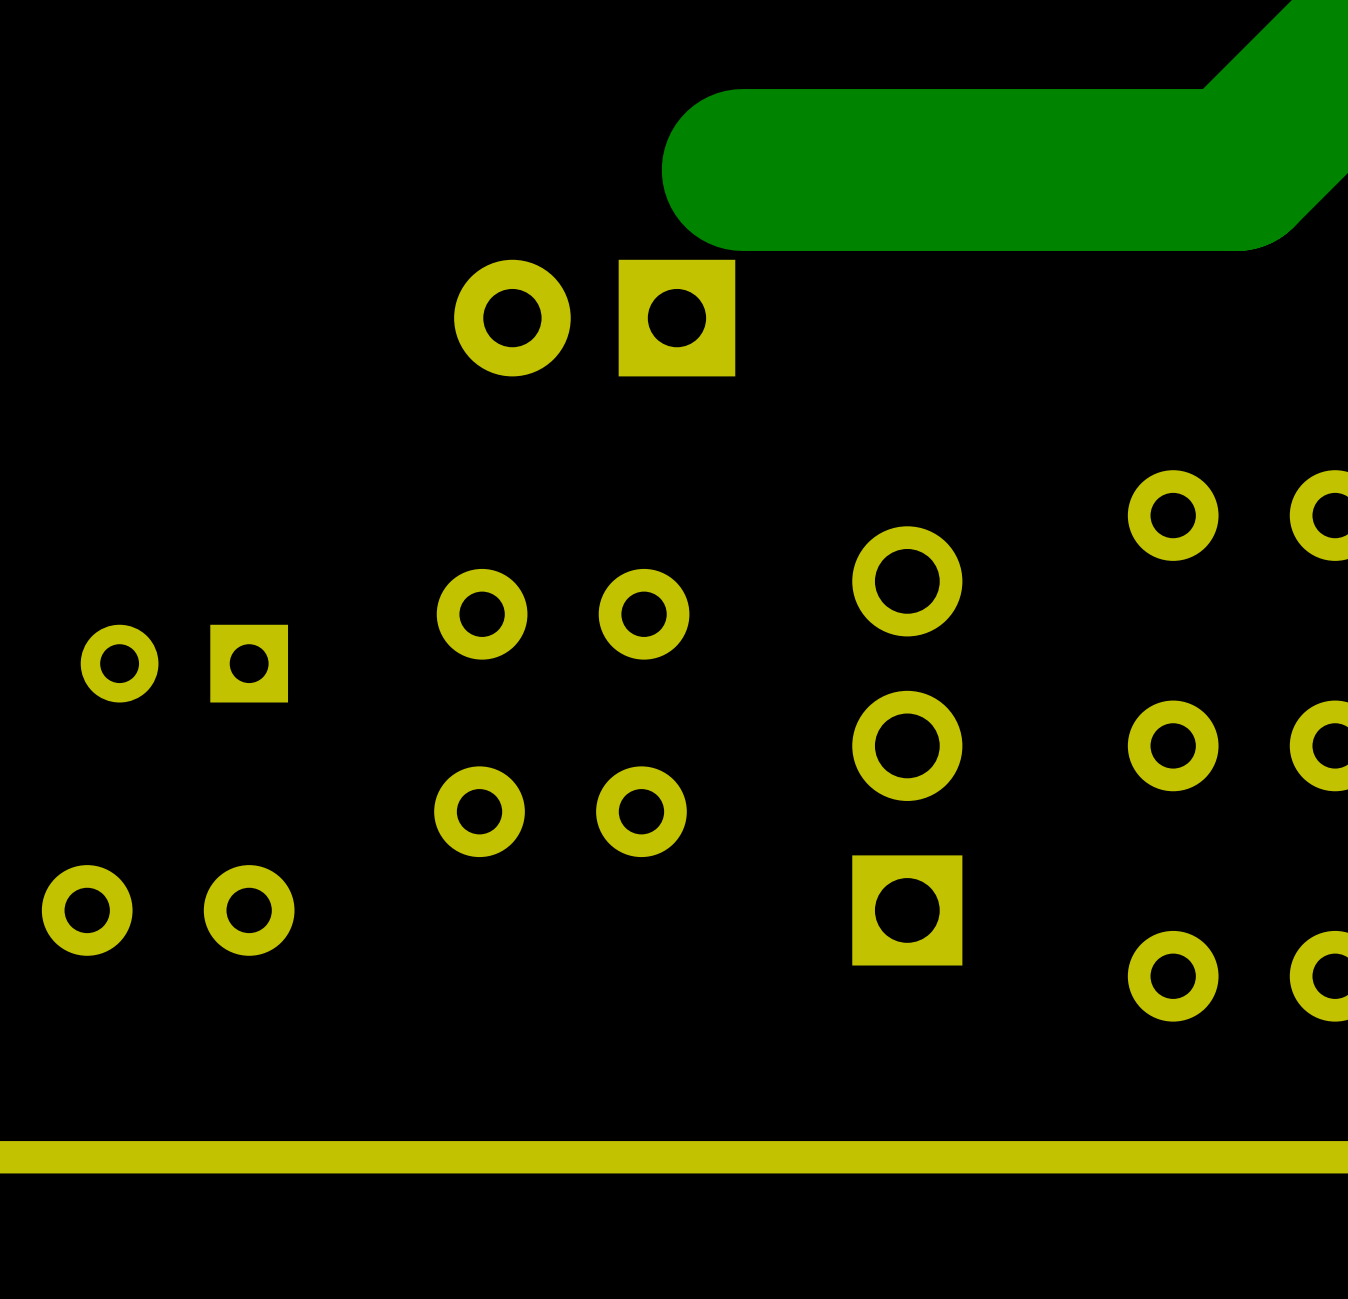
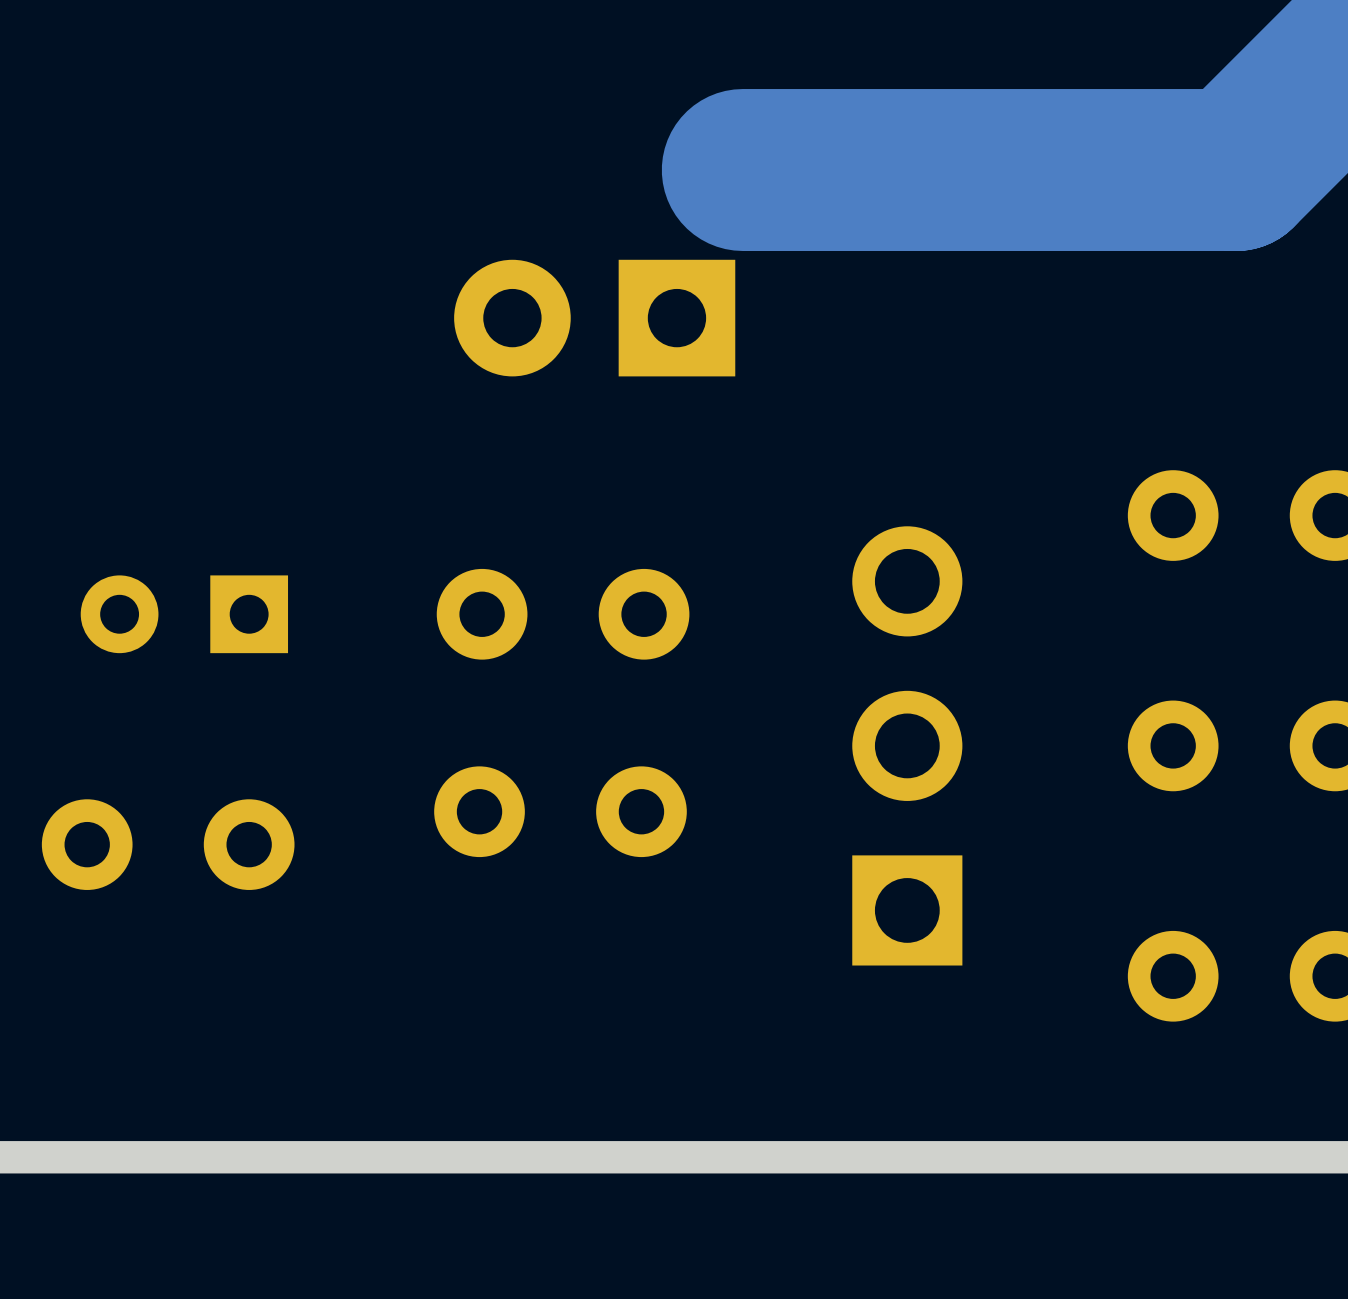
part position: (184, 663) -> (184, 614)
part position: (168, 910) -> (168, 844)

